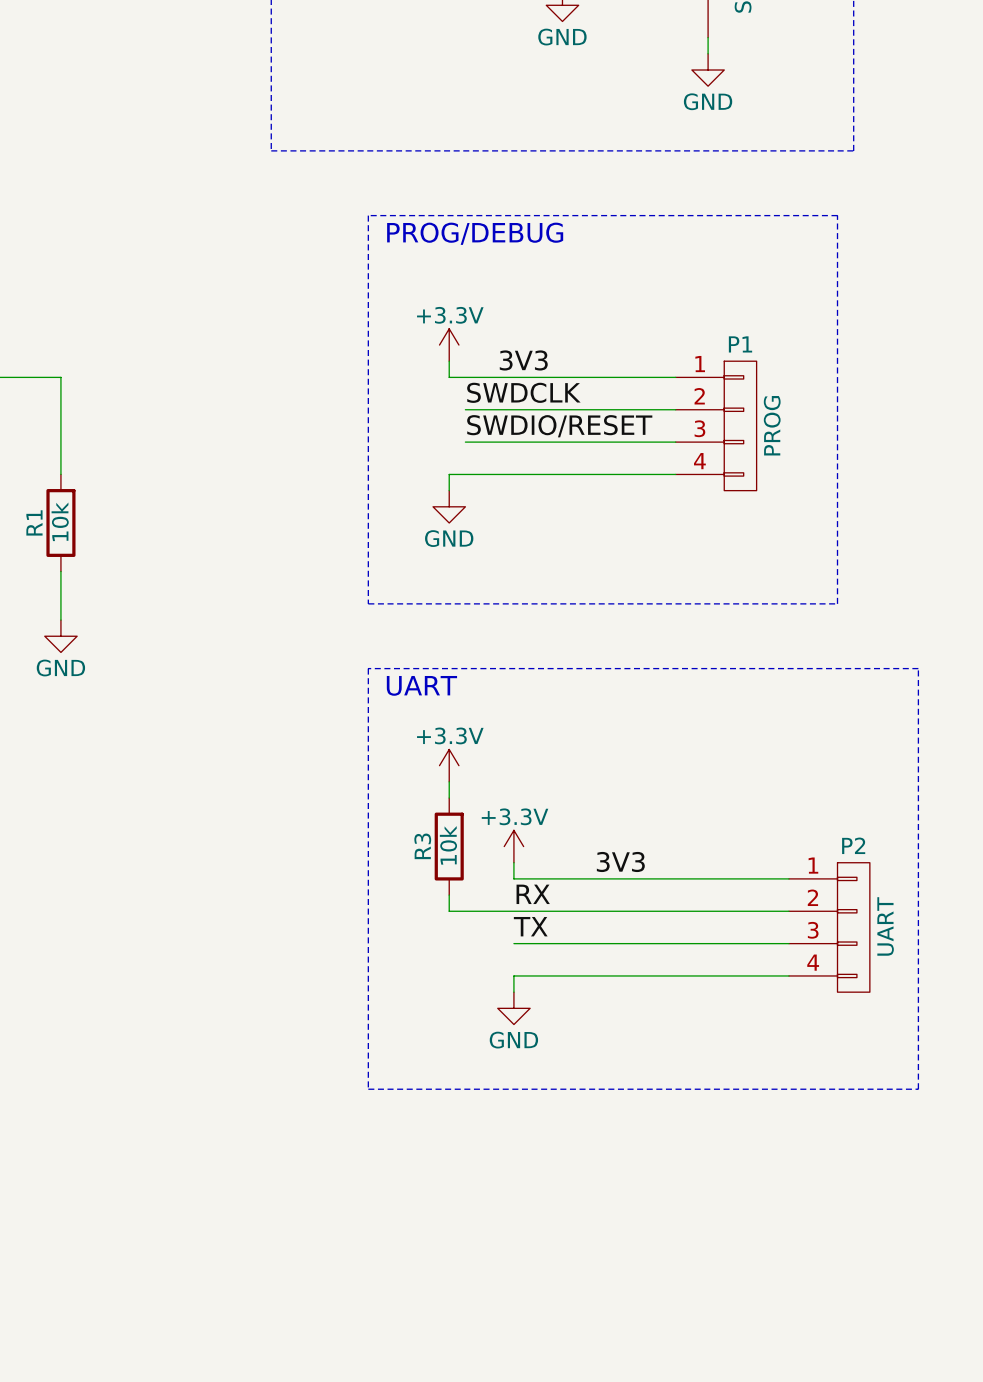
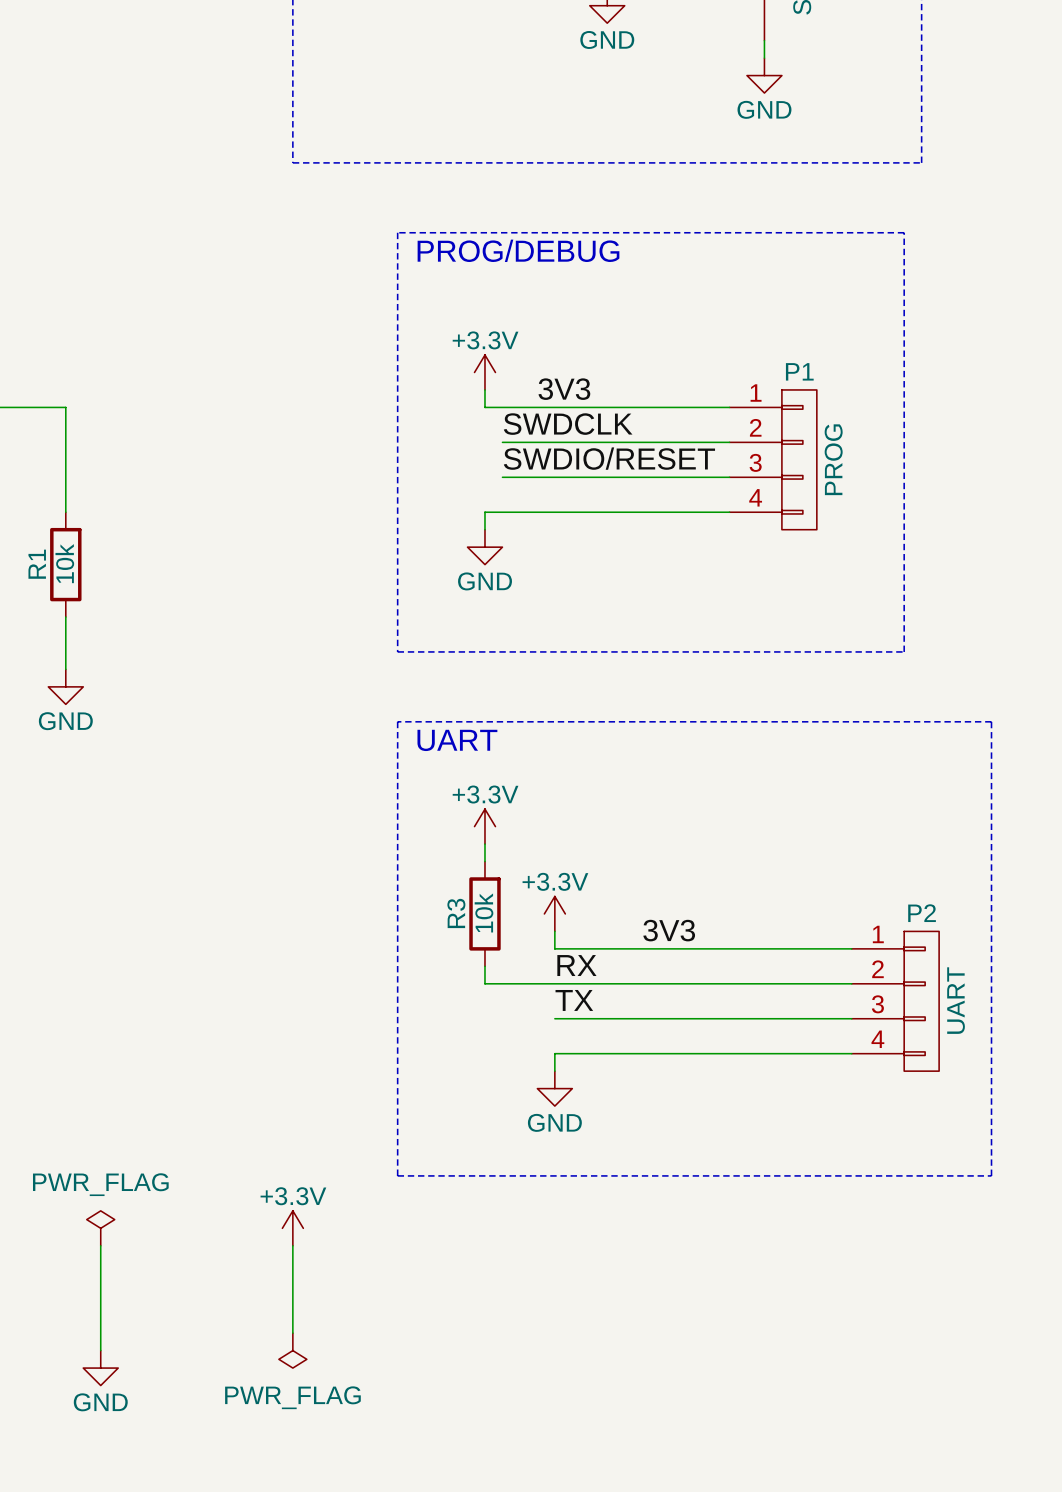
power symbol: none -> PWR_FLAG (100, 1228)
power symbol: none -> +3.3V (292, 1228)
wire: none -> (100, 1245) (100, 1350)
wire: none -> (292, 1245) (292, 1333)
power symbol: none -> PWR_FLAG (292, 1350)
power symbol: none -> GND (100, 1368)

